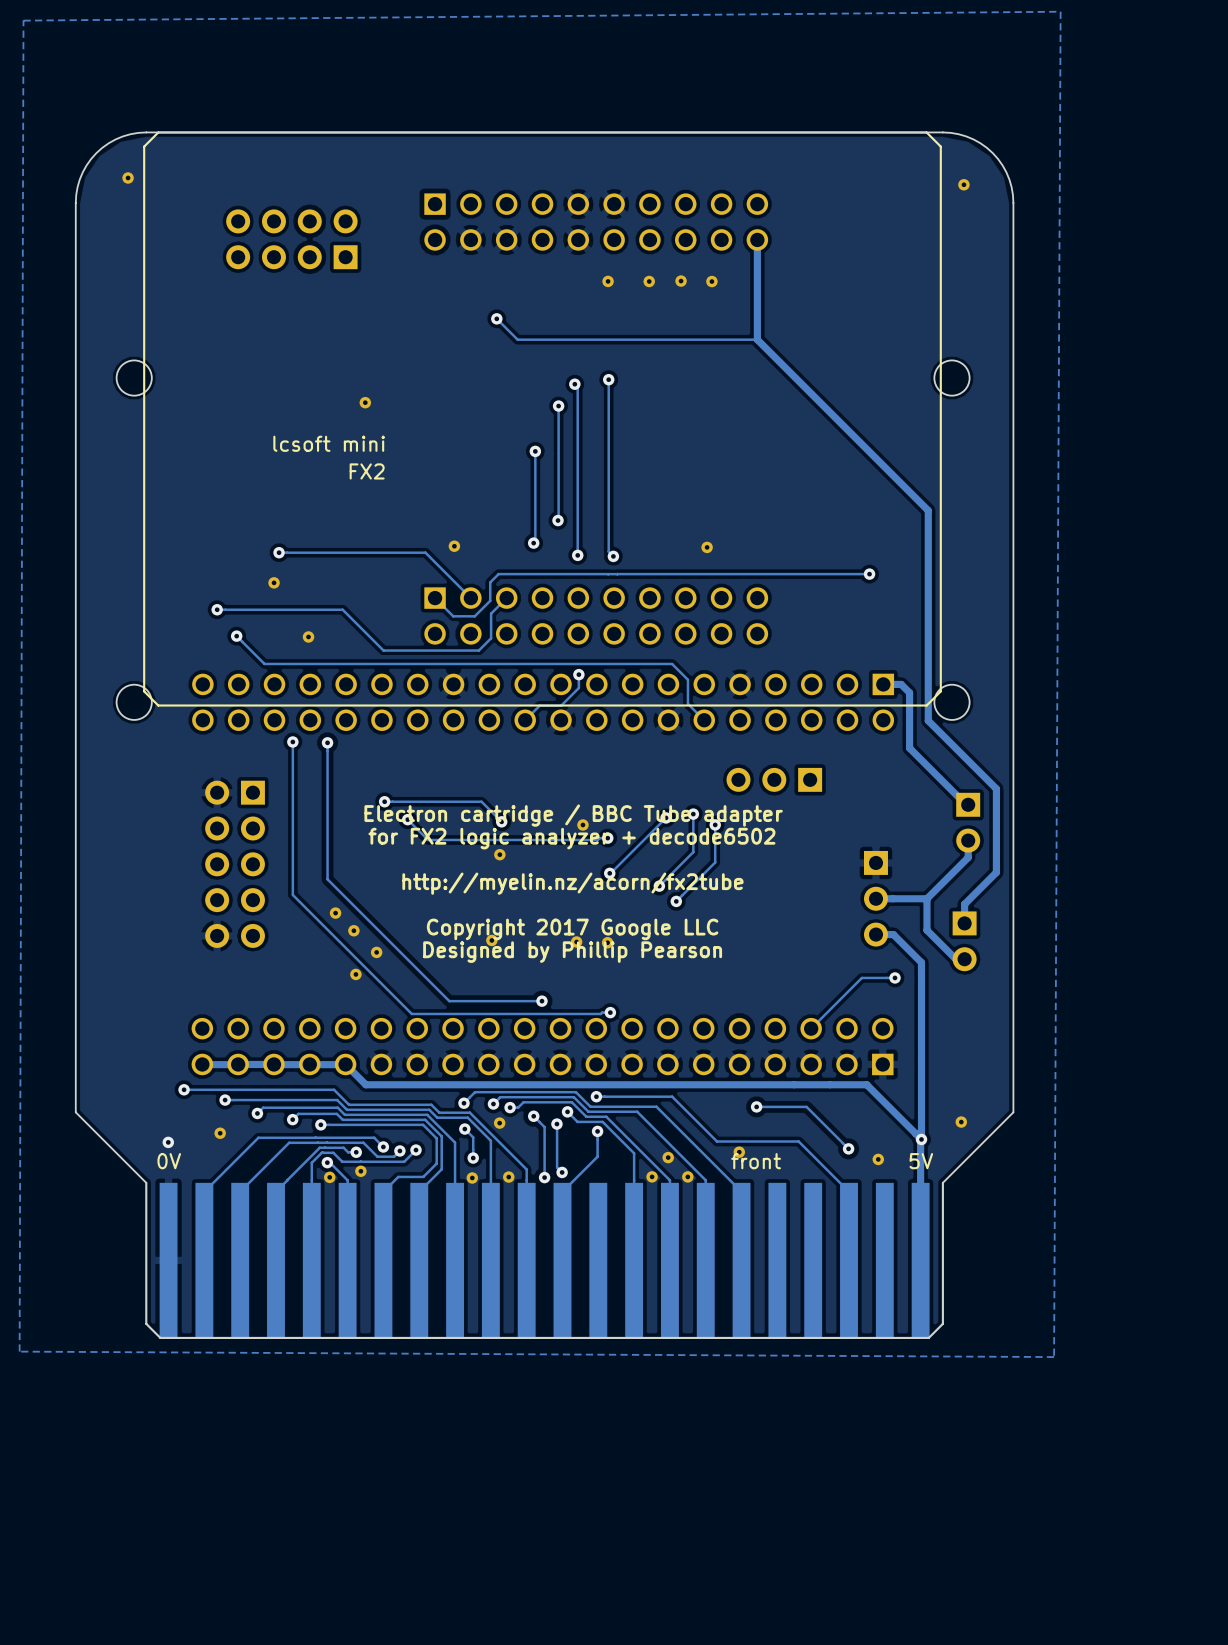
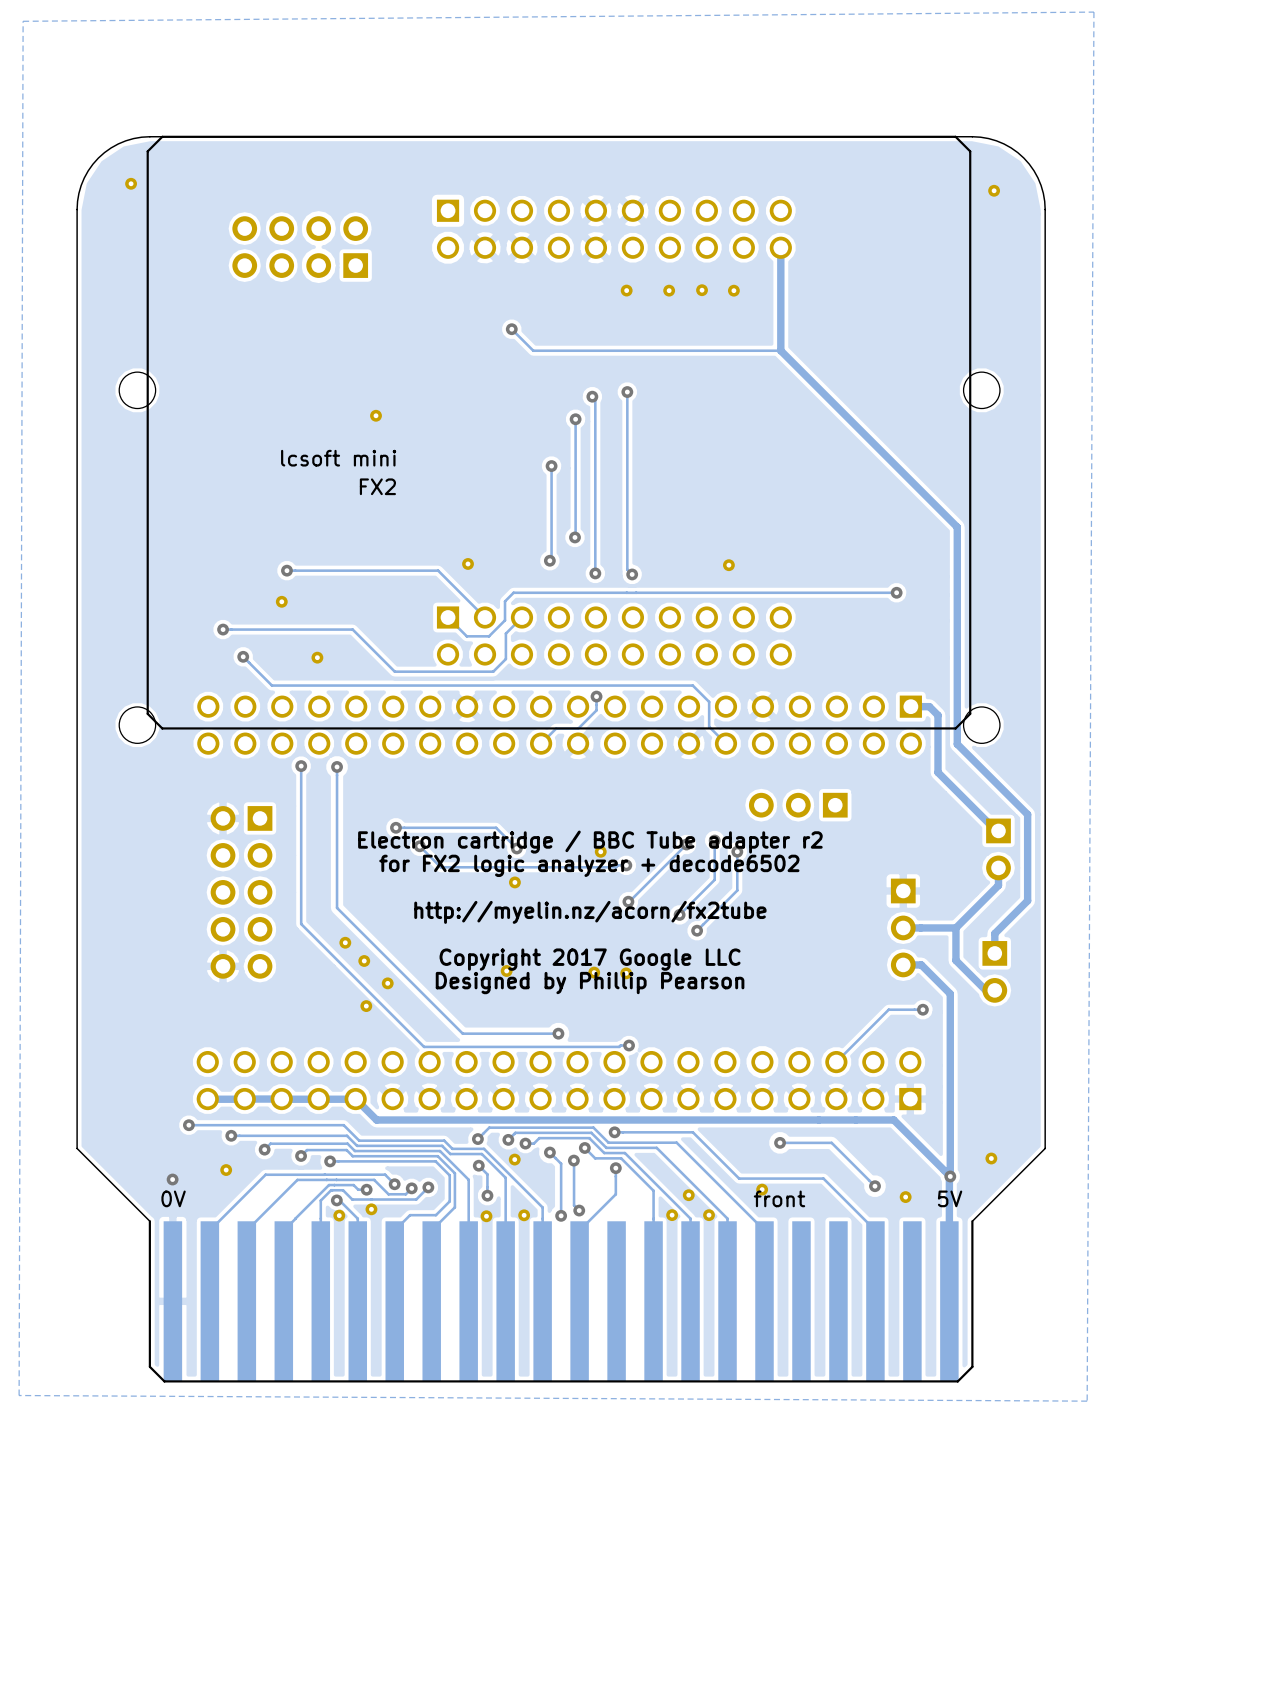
text: Electron cartridge / BBC Tube adapter (573, 815) -> Electron cartridge / BBC Tube adapter r2 (590, 842)

